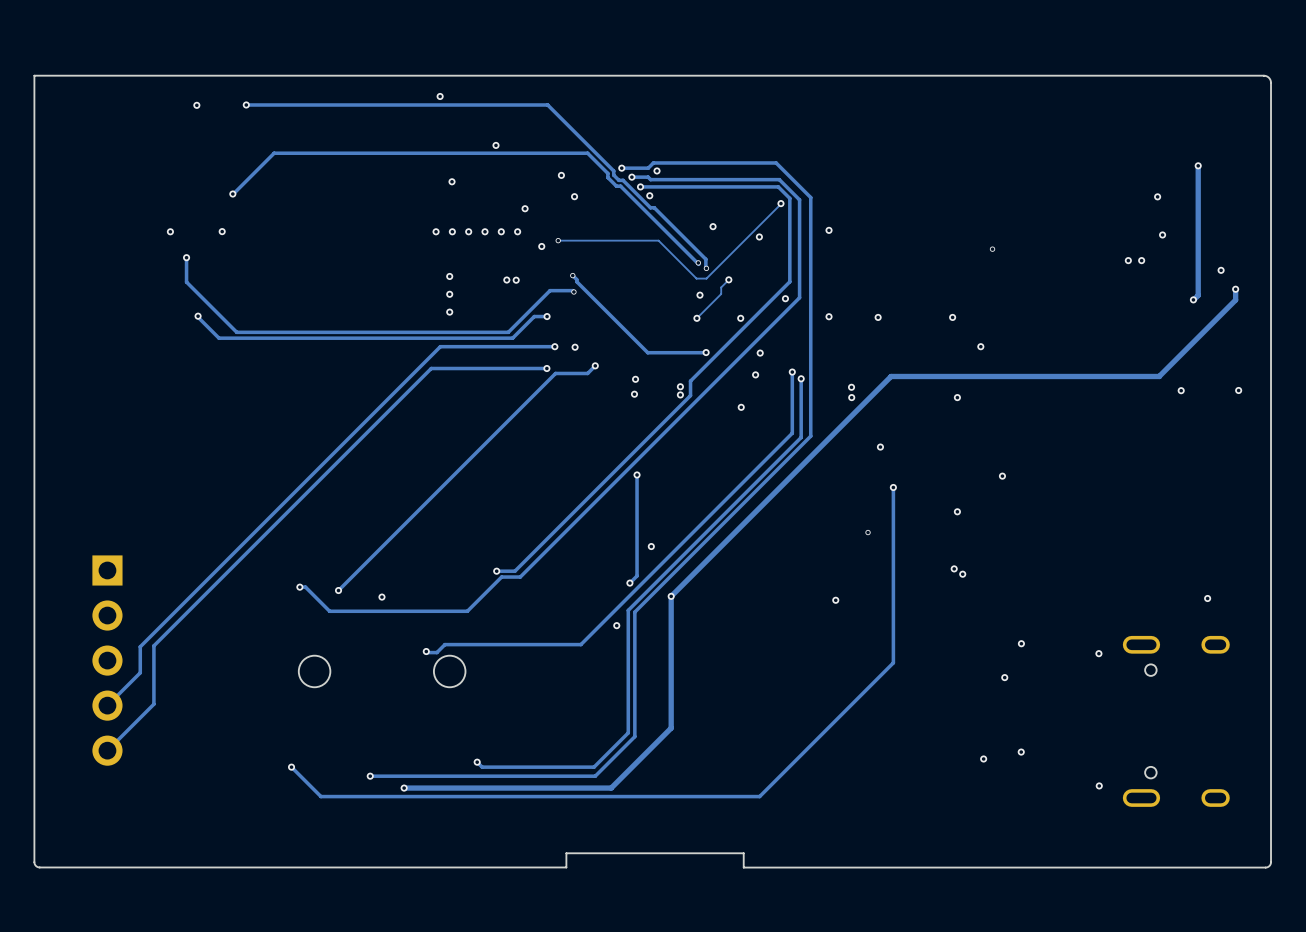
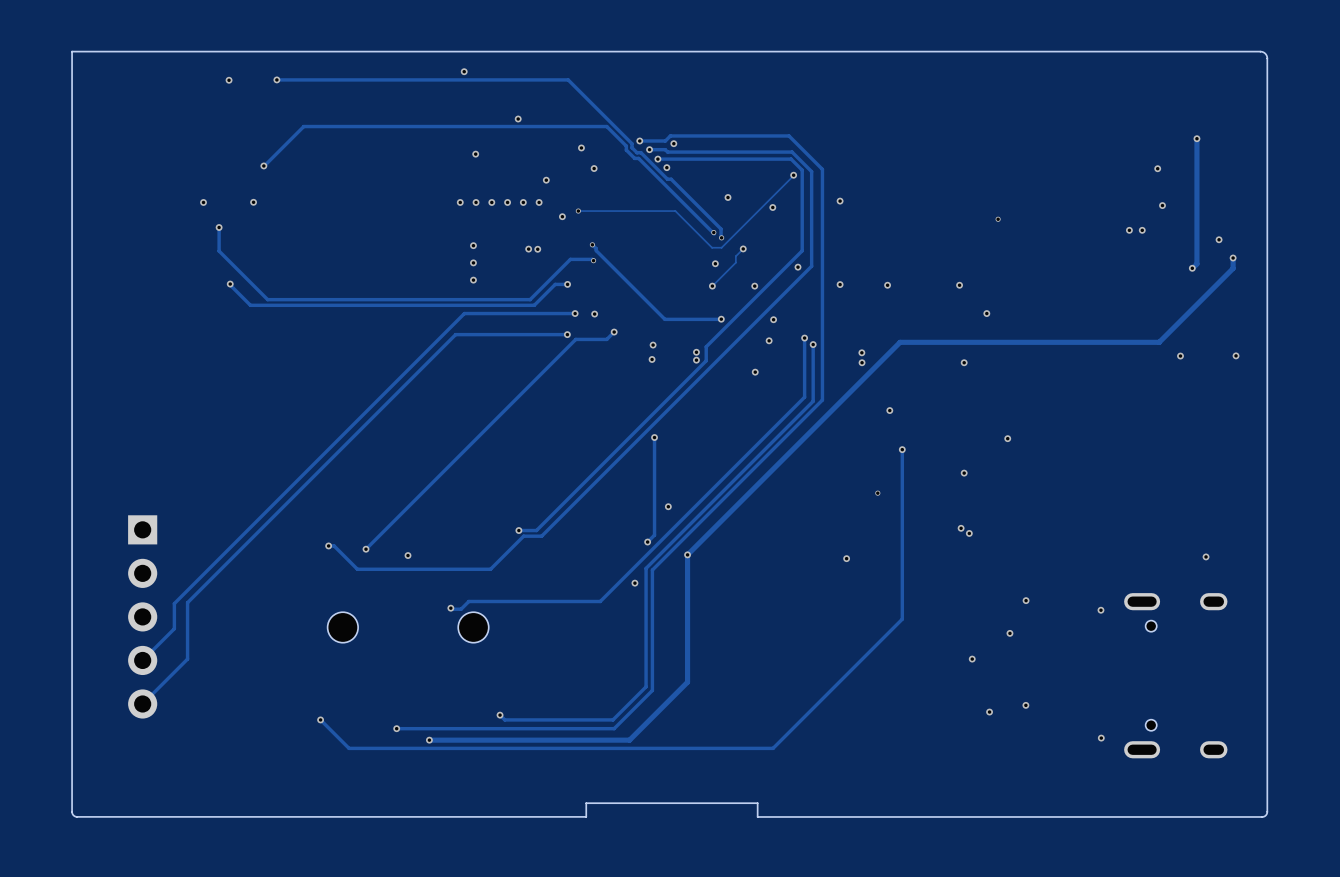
via: none -> (972, 659)

